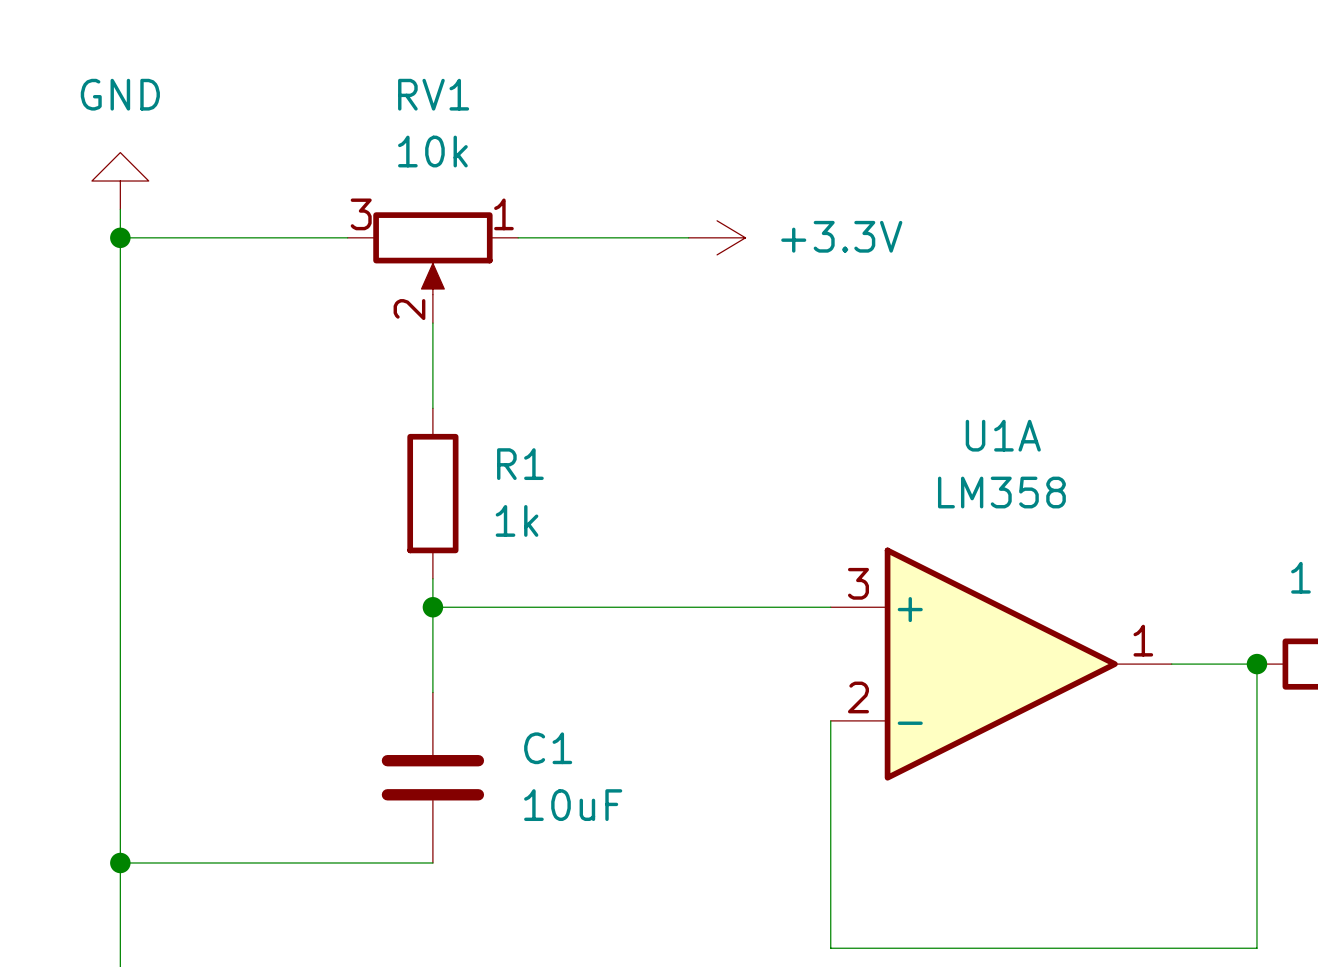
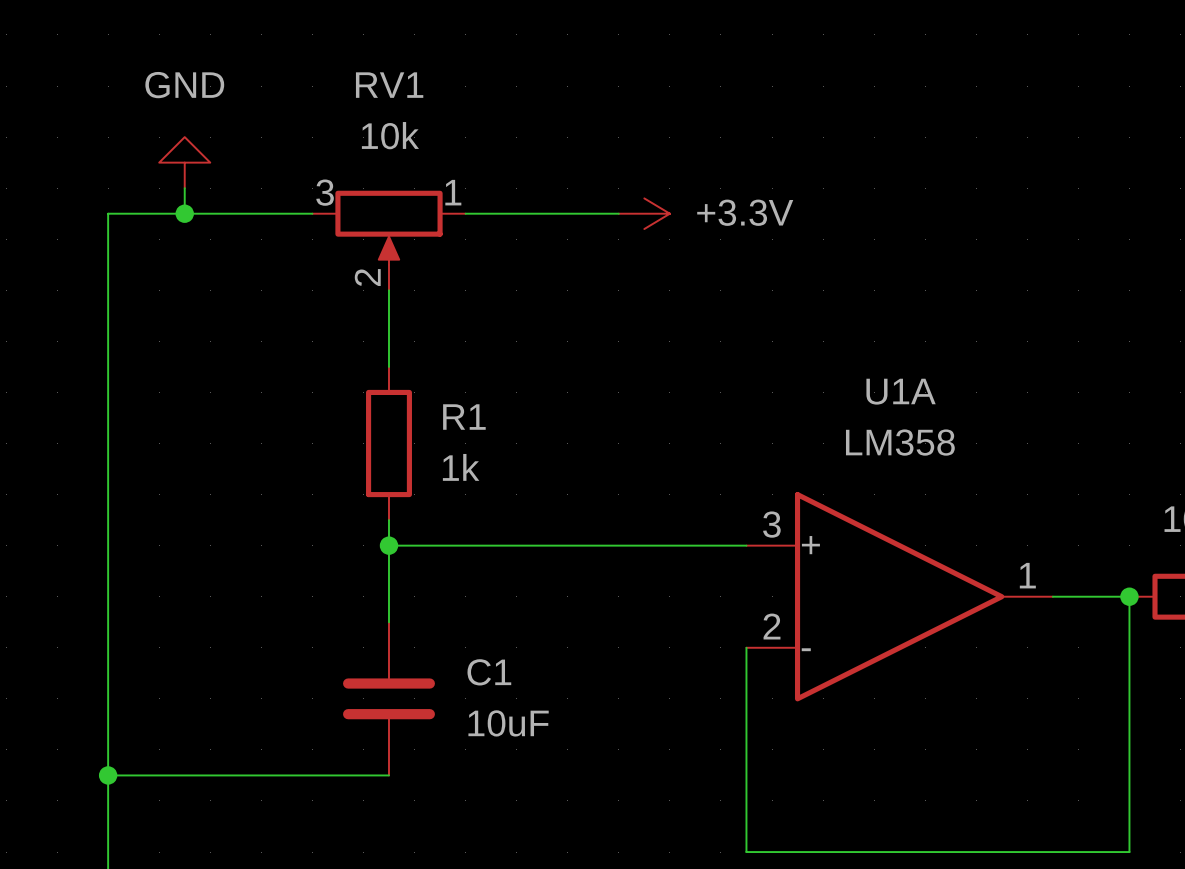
power symbol position: GND (120, 181) -> GND (184, 162)
wire: (120, 209) (120, 237) -> (184, 188) (184, 213)
junction position: (120, 237) -> (184, 213)

